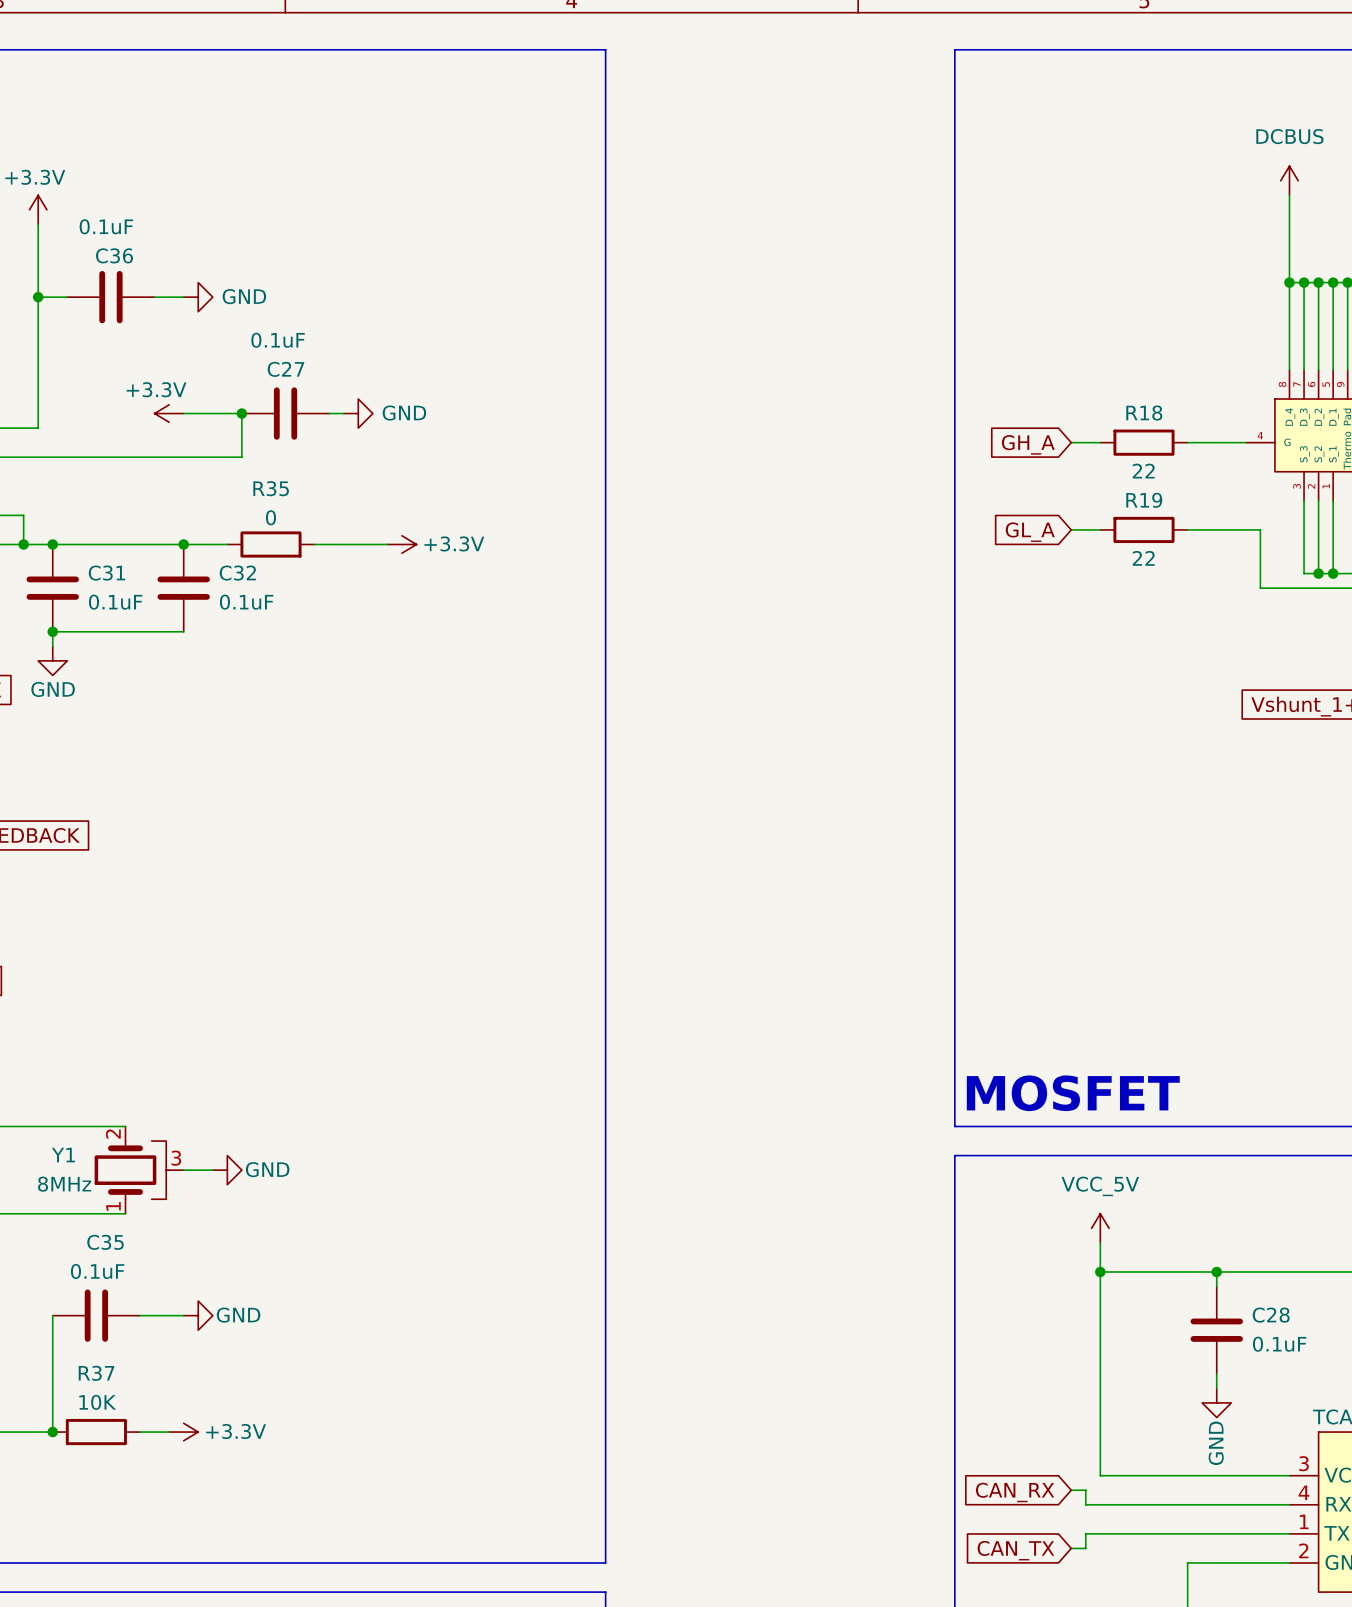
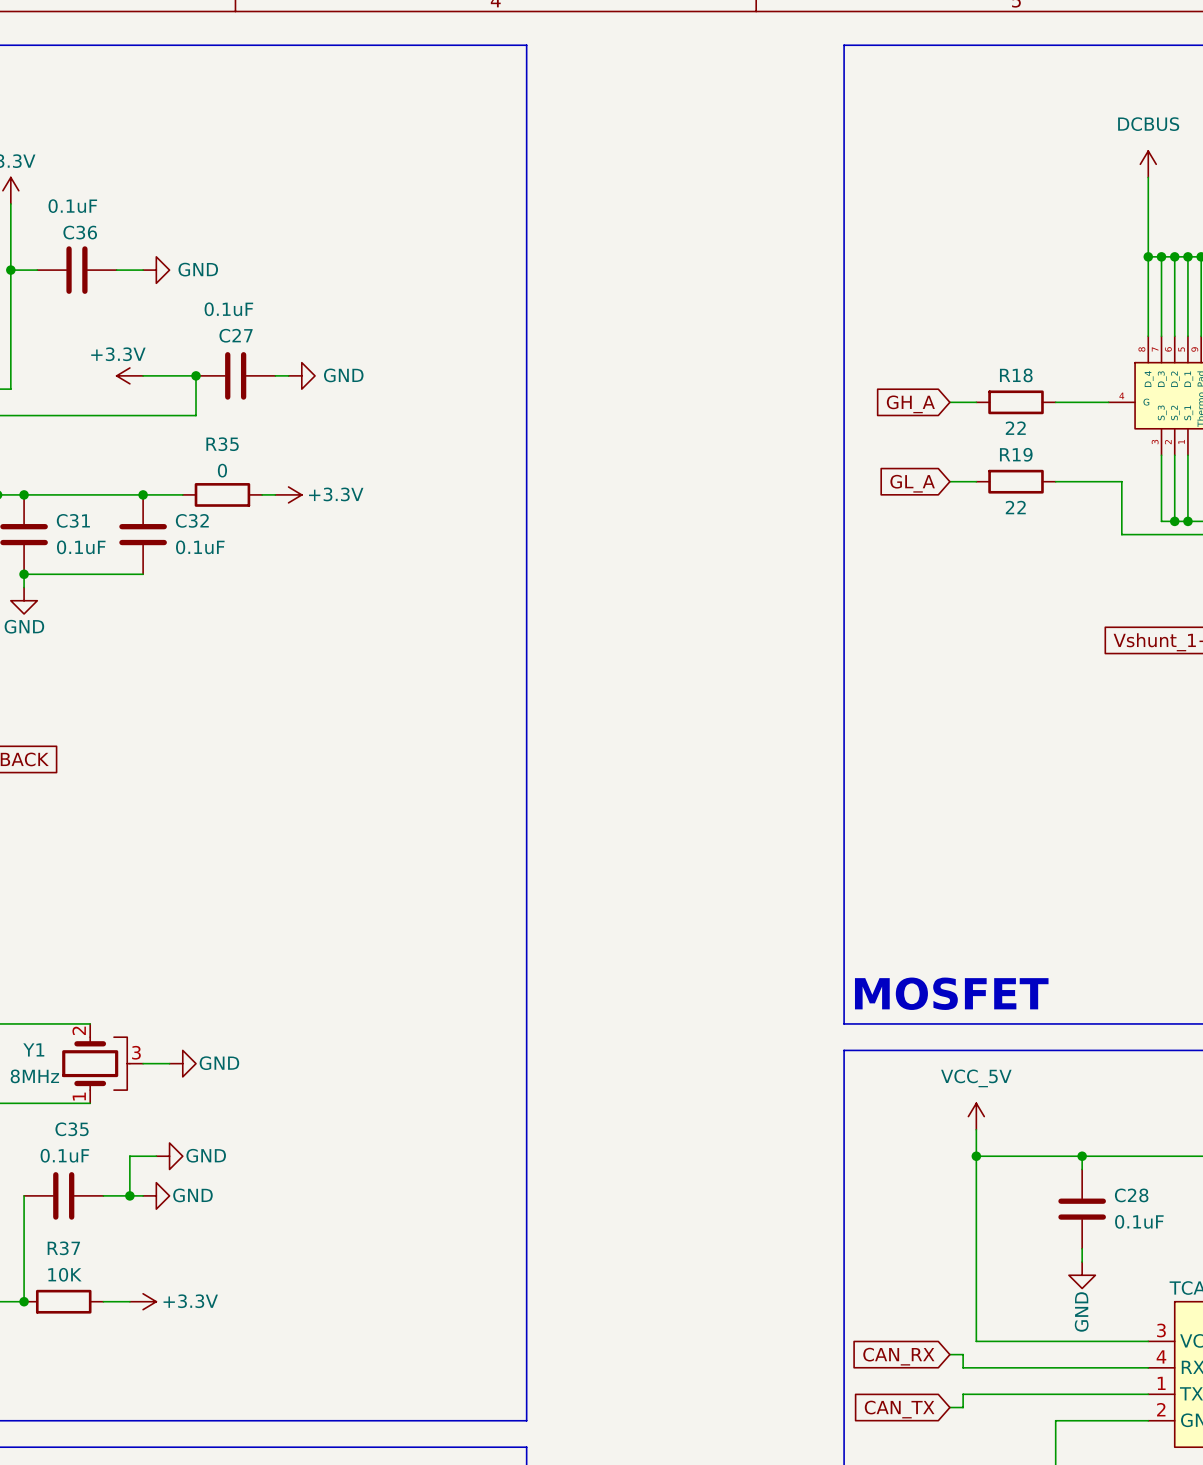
power symbol position: +3.3V (401, 544) -> +3.3V (288, 494)
wire: none -> (156, 1156) (129, 1156) (129, 1195)
power symbol: none -> GND (169, 1156)
junction: none -> (129, 1195)

